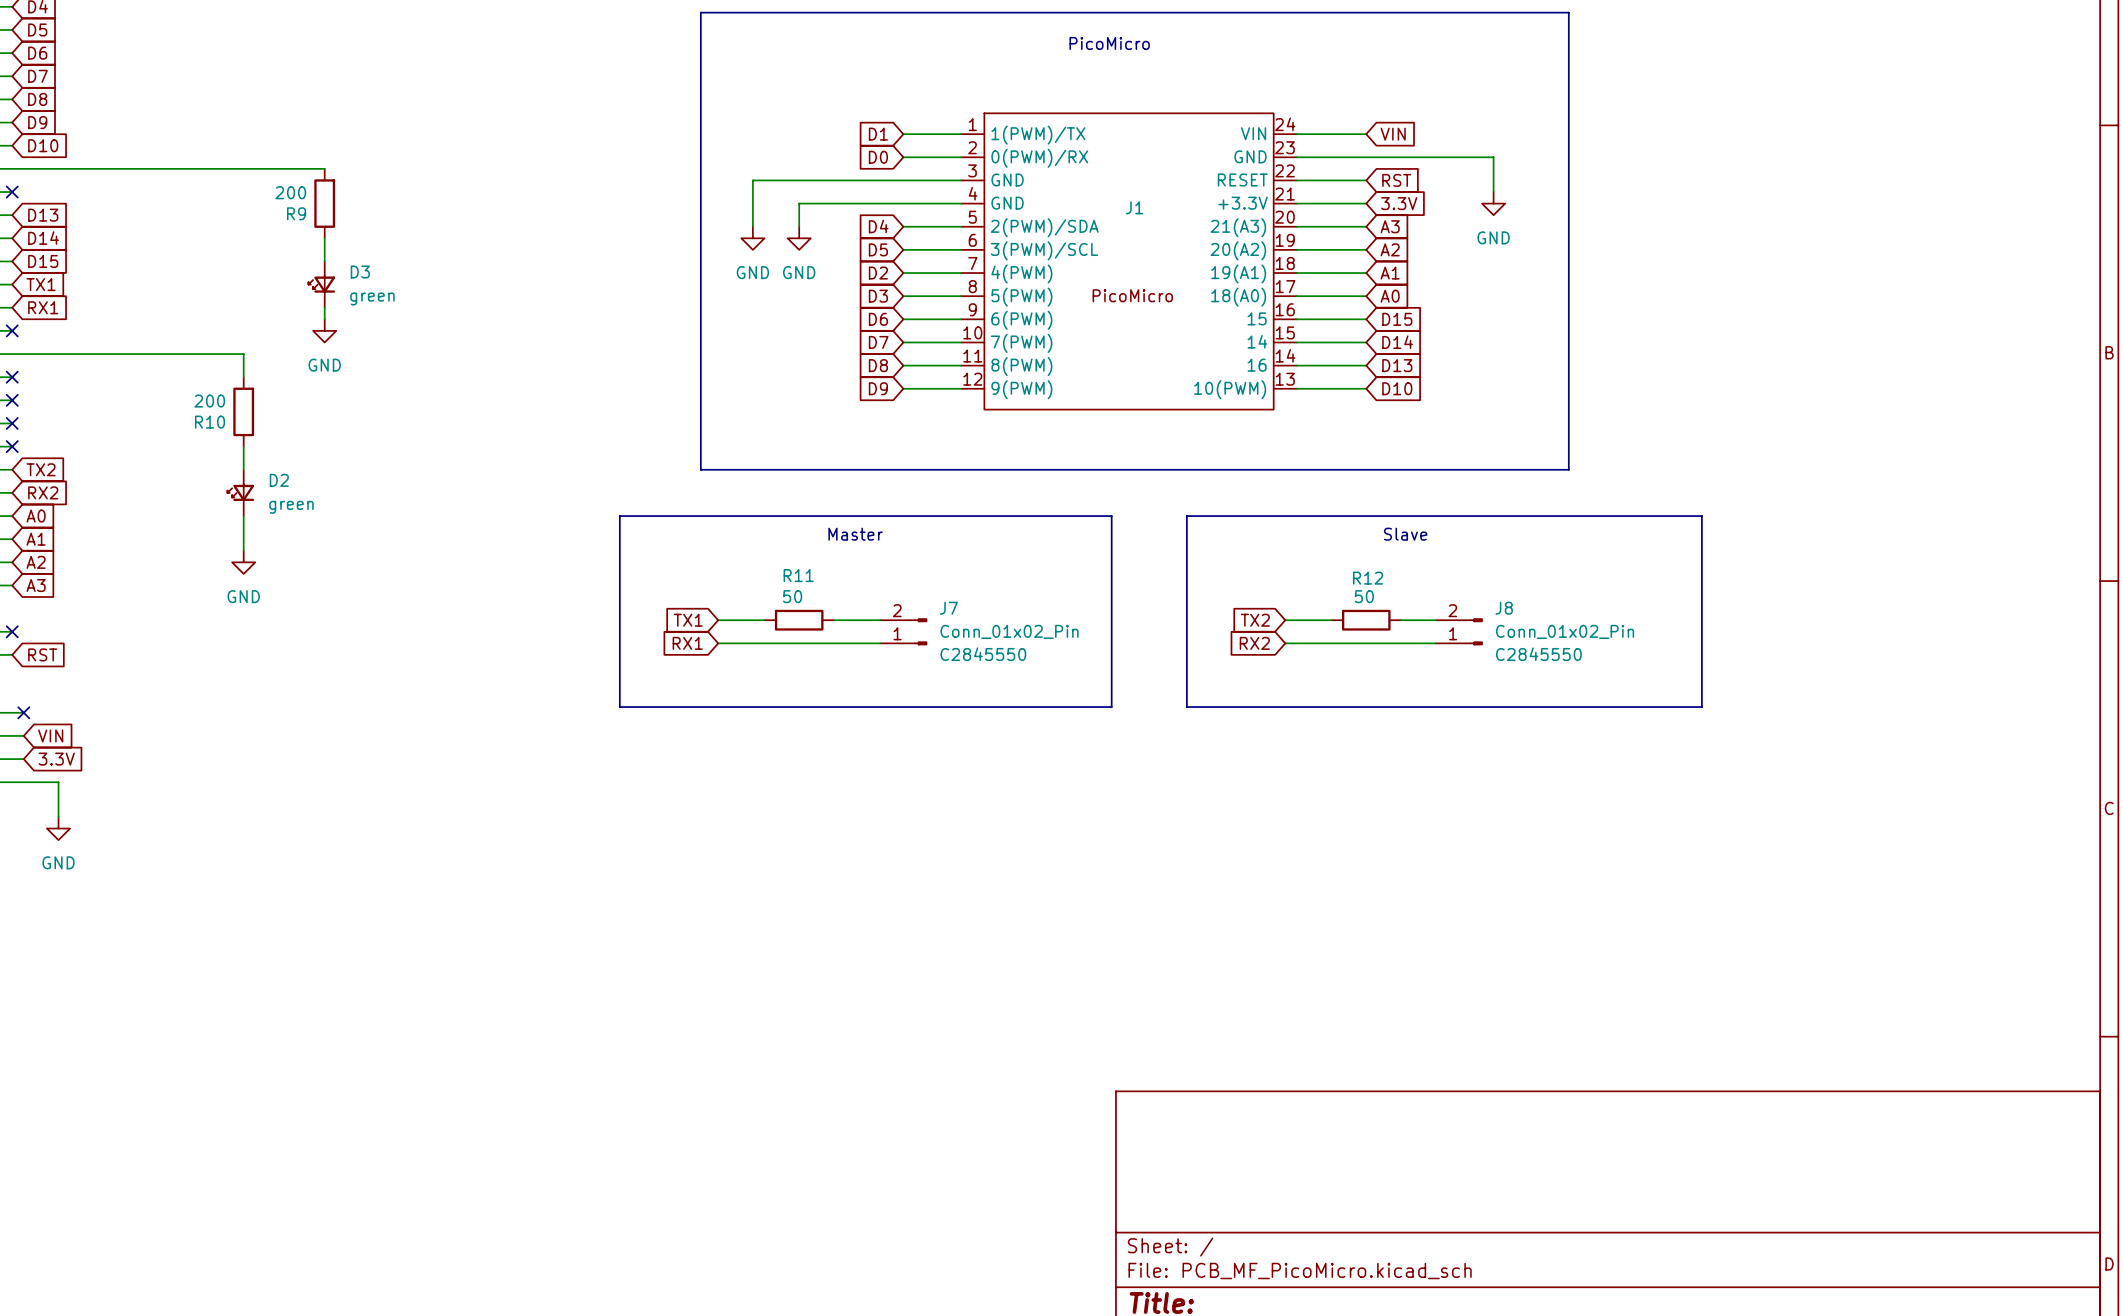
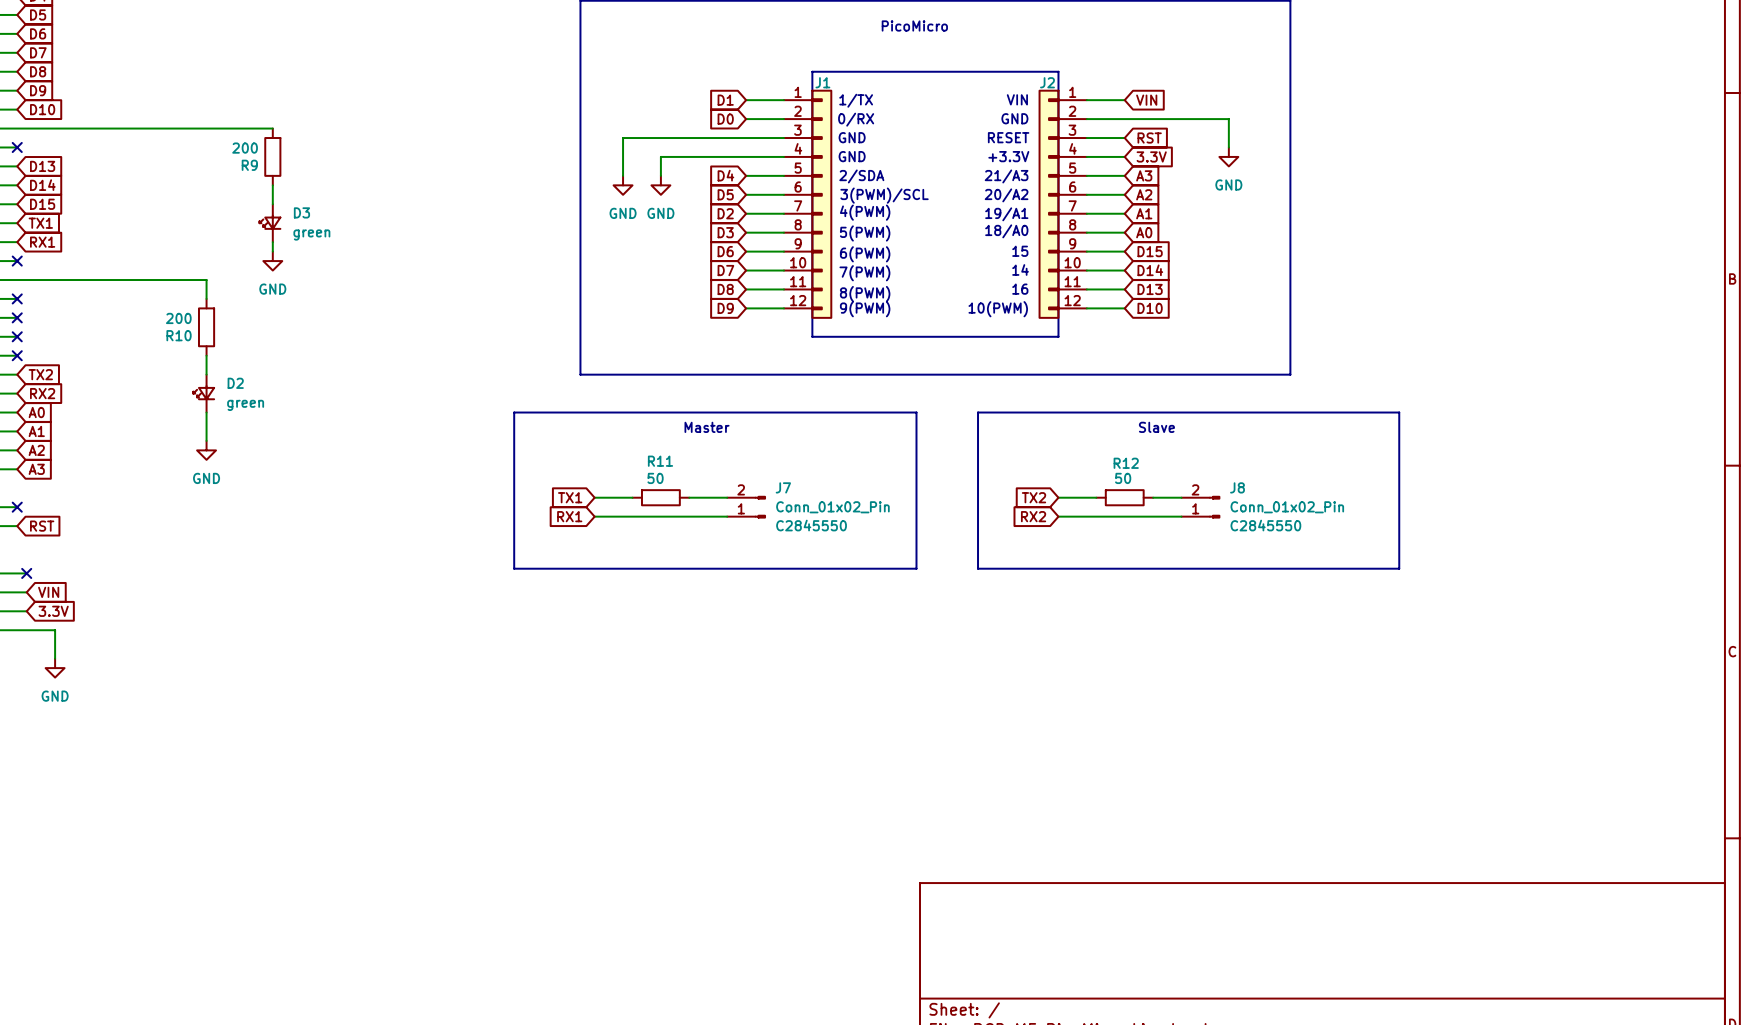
line: none -> (812, 71) (1058, 71) (1058, 336) (812, 336) (812, 71)
J1 symbol: [961, 113, 1297, 410] -> [783, 89, 833, 319]
text: none -> VIN (1017, 99)
text: none -> 1/TX (856, 100)
text: none -> GND (1014, 118)
text: none -> 0/RX (856, 119)
text: none -> GND (852, 137)
text: none -> RESET (1008, 137)
text: none -> GND (852, 156)
text: none -> +3.3V (1008, 156)
J1 name position: J1 (1134, 207) -> J1 (822, 82)
text: none -> 2/SDA (861, 176)
text: none -> 21/A3 (1006, 176)
text: none -> 3(PWM)/SCL (884, 195)
text: none -> 20/A2 (1006, 195)
J2: none -> (1062, 204)
text: none -> 4(PWM) (865, 212)
text: none -> 19/A1 (1006, 214)
text: none -> 18/A0 (1006, 231)
text: none -> 5(PWM) (865, 233)
text: none -> 15 (1020, 251)
text: none -> 6(PWM) (865, 254)
text: none -> 14 (1020, 269)
text: none -> 7(PWM) (864, 273)
text: none -> 16 (1020, 289)
text: none -> 8(PWM) (865, 294)
text: none -> 9(PWM) (865, 309)
text: none -> 10(PWM) (998, 309)

